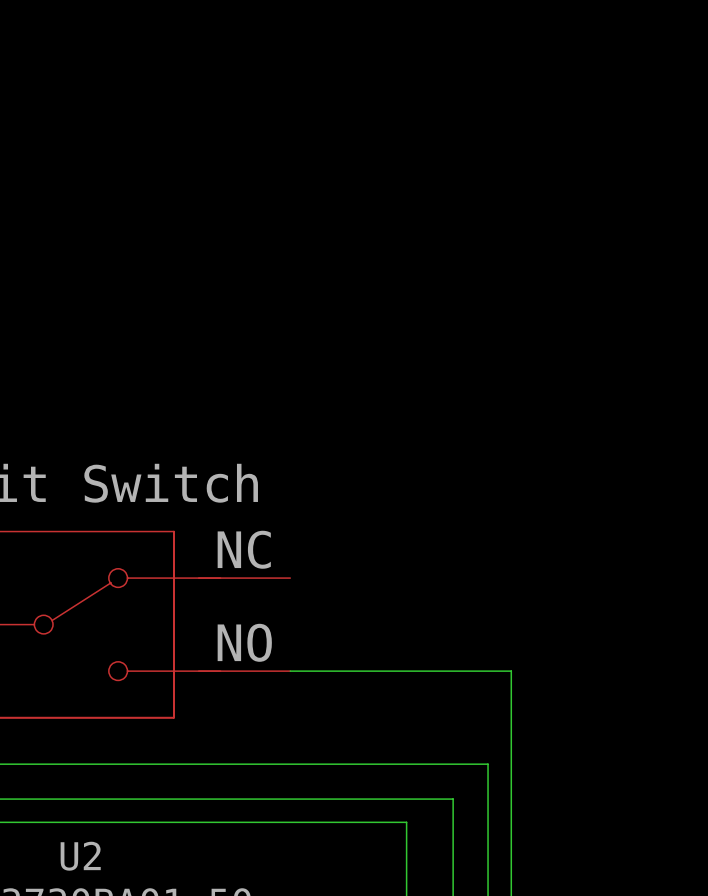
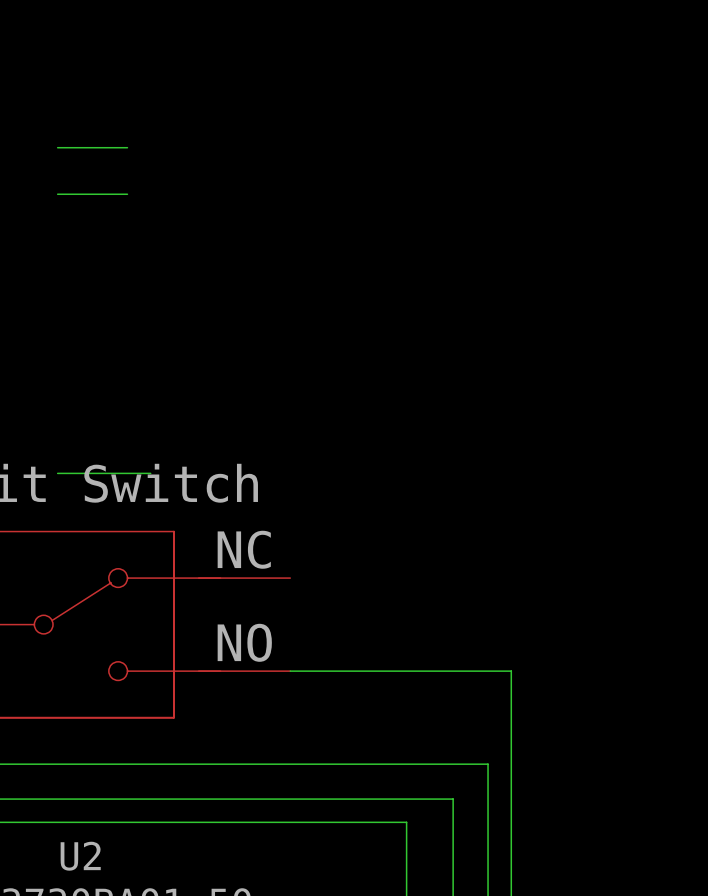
wire: none -> (57, 147) (127, 147)
wire: none -> (57, 194) (127, 194)
wire: none -> (57, 473) (150, 473)

